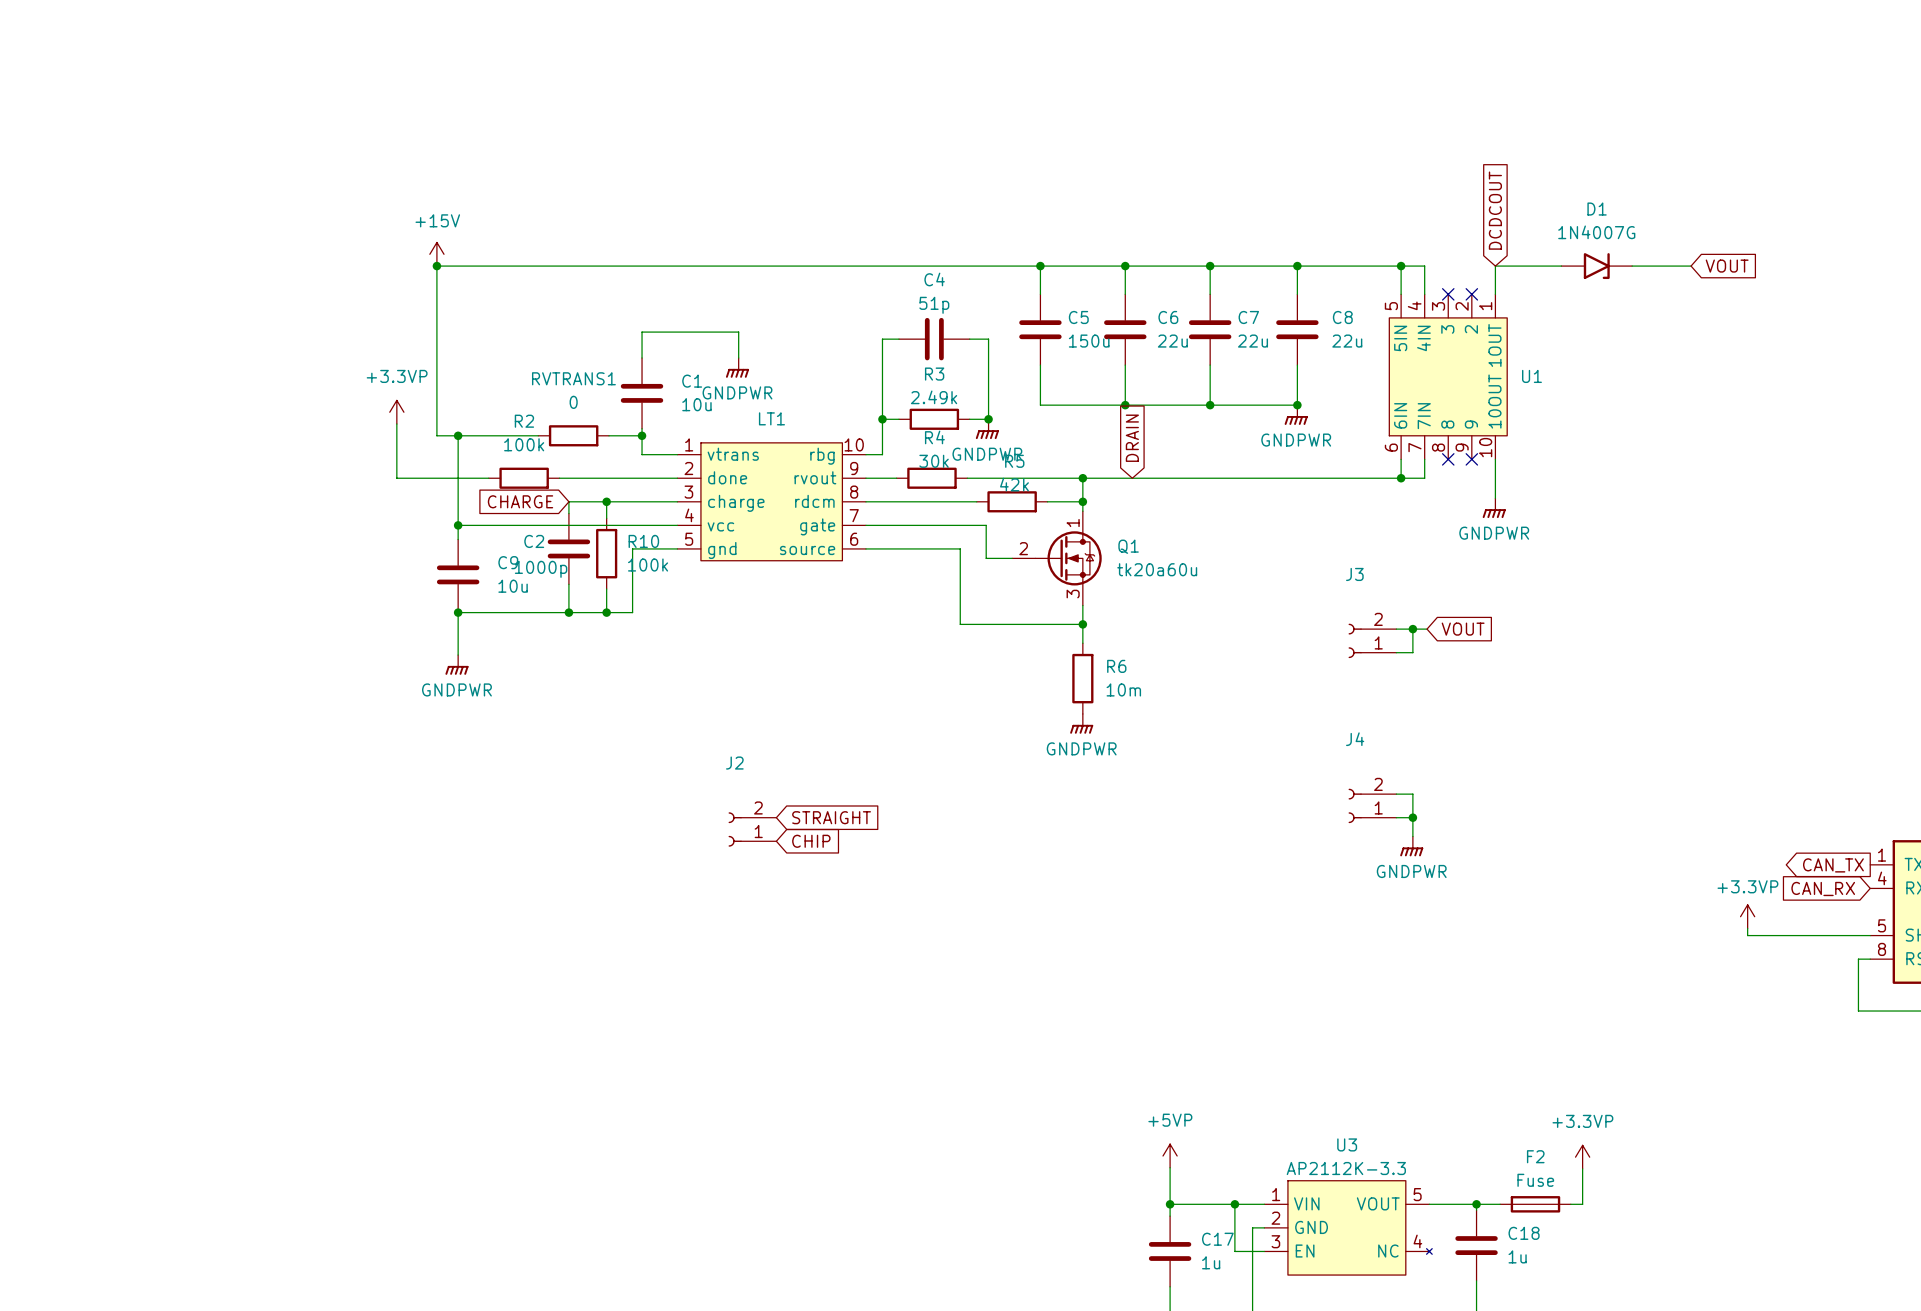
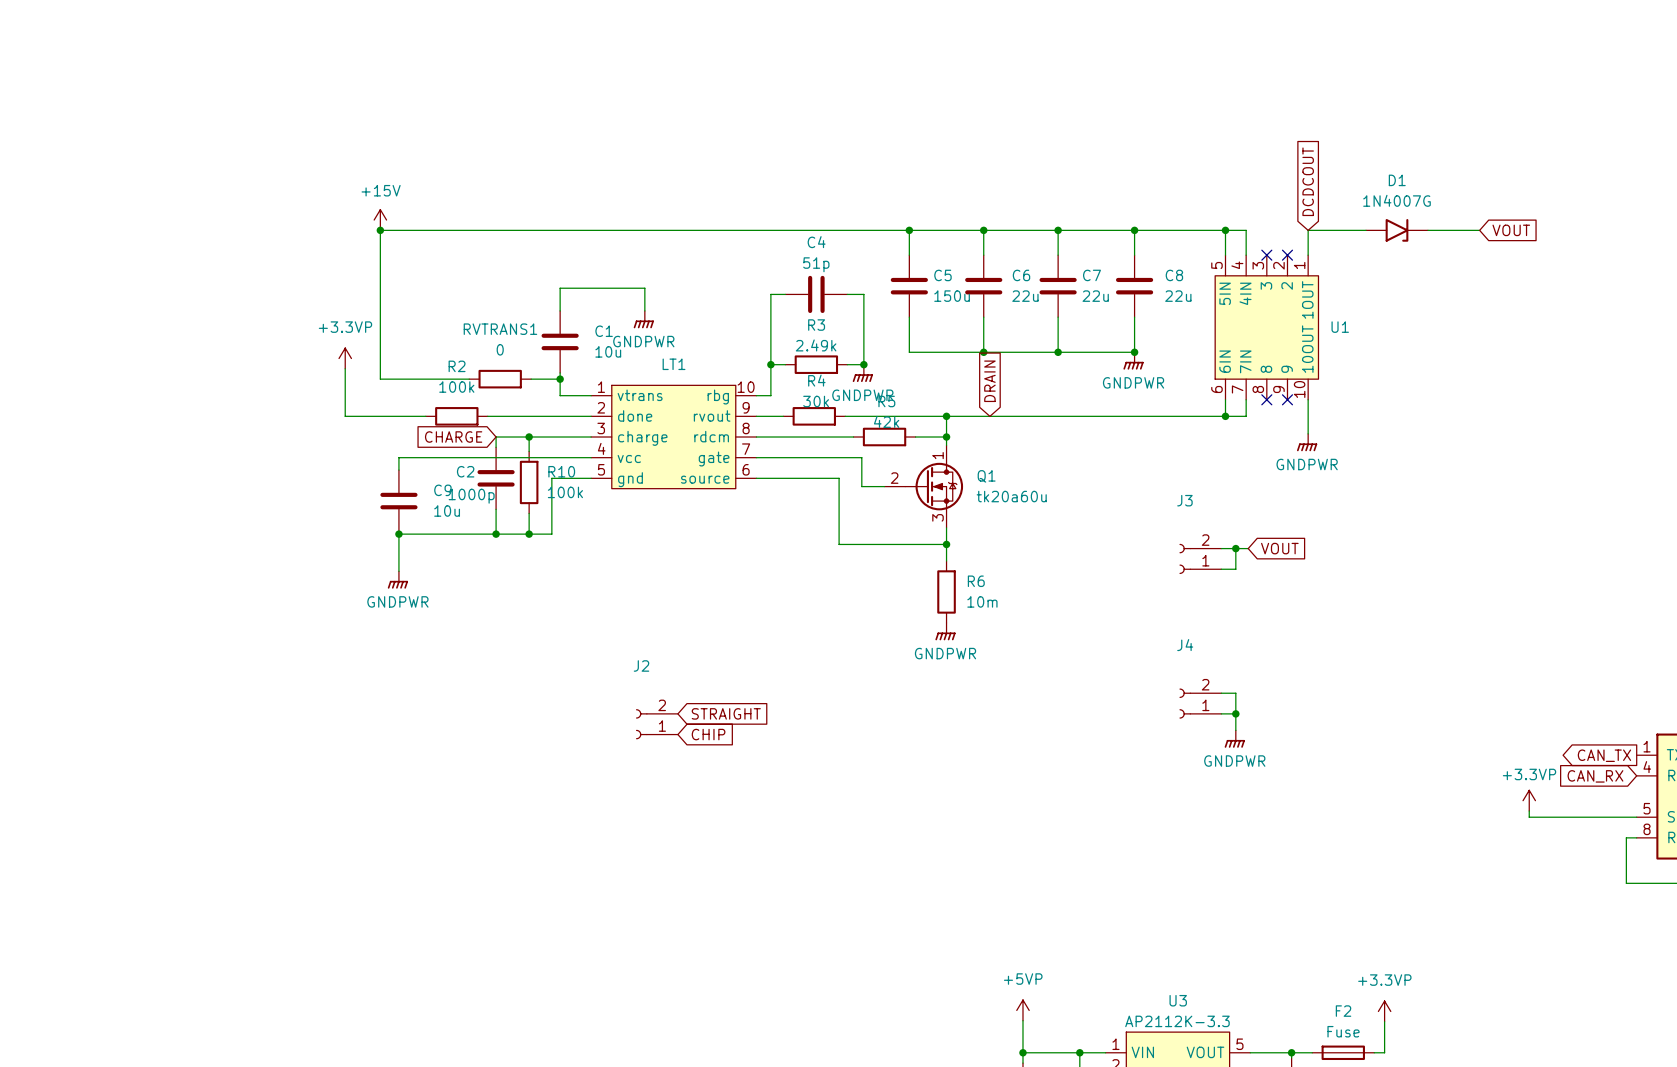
wire: (458, 435) (458, 525) -> none
junction: (458, 435) -> none
junction: (458, 525) -> none

